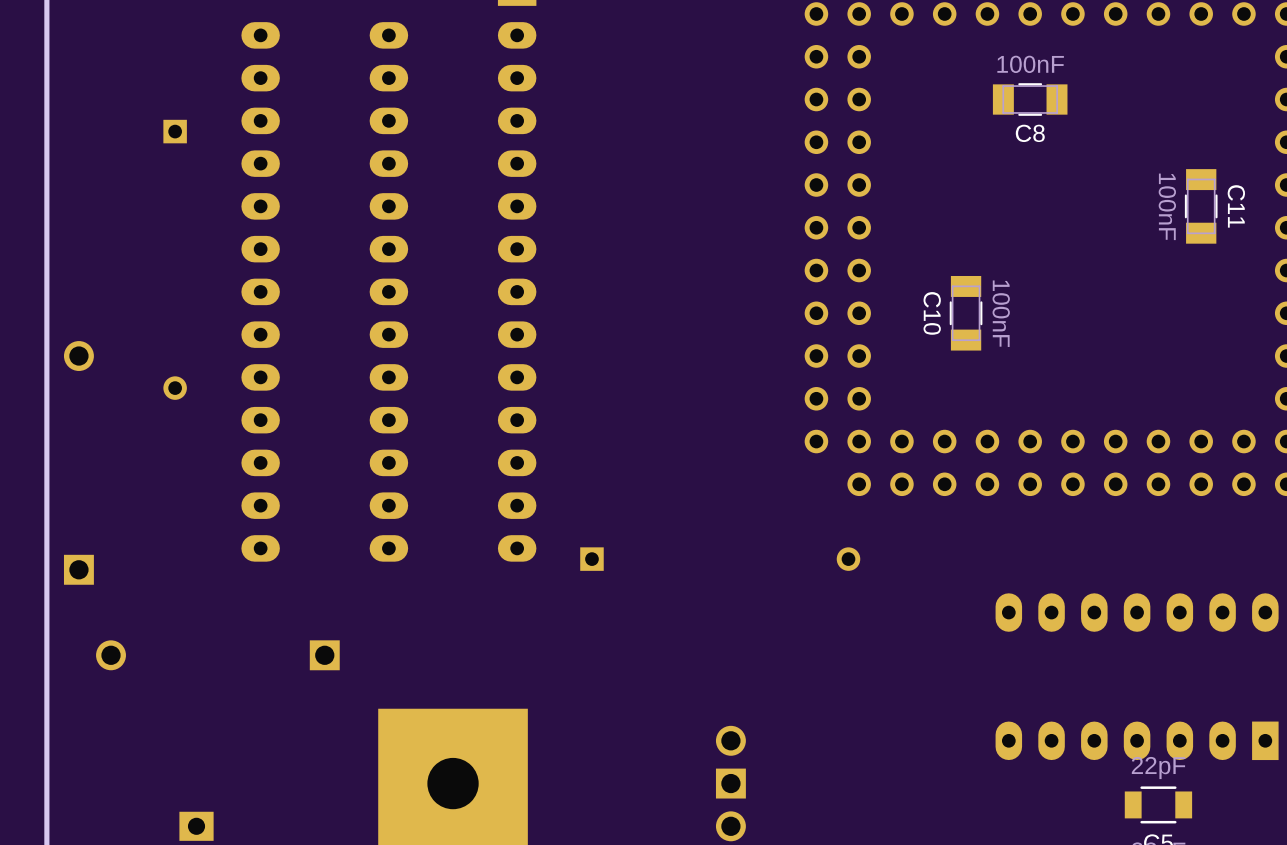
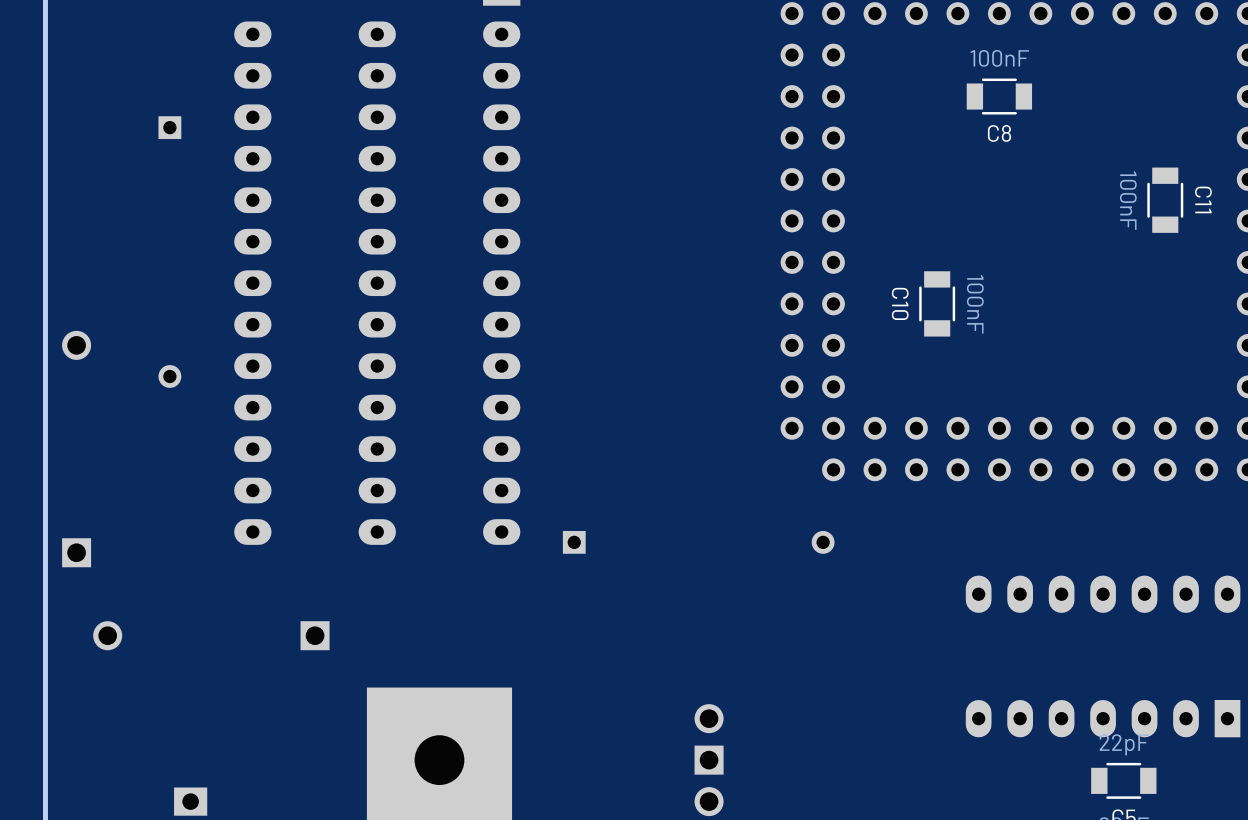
C8 footprint: [992, 83, 1068, 116] -> [966, 78, 1033, 115]
C11 footprint: [1184, 169, 1218, 244] -> [1147, 167, 1184, 233]
C10 footprint: [949, 275, 983, 351] -> [919, 271, 956, 337]

